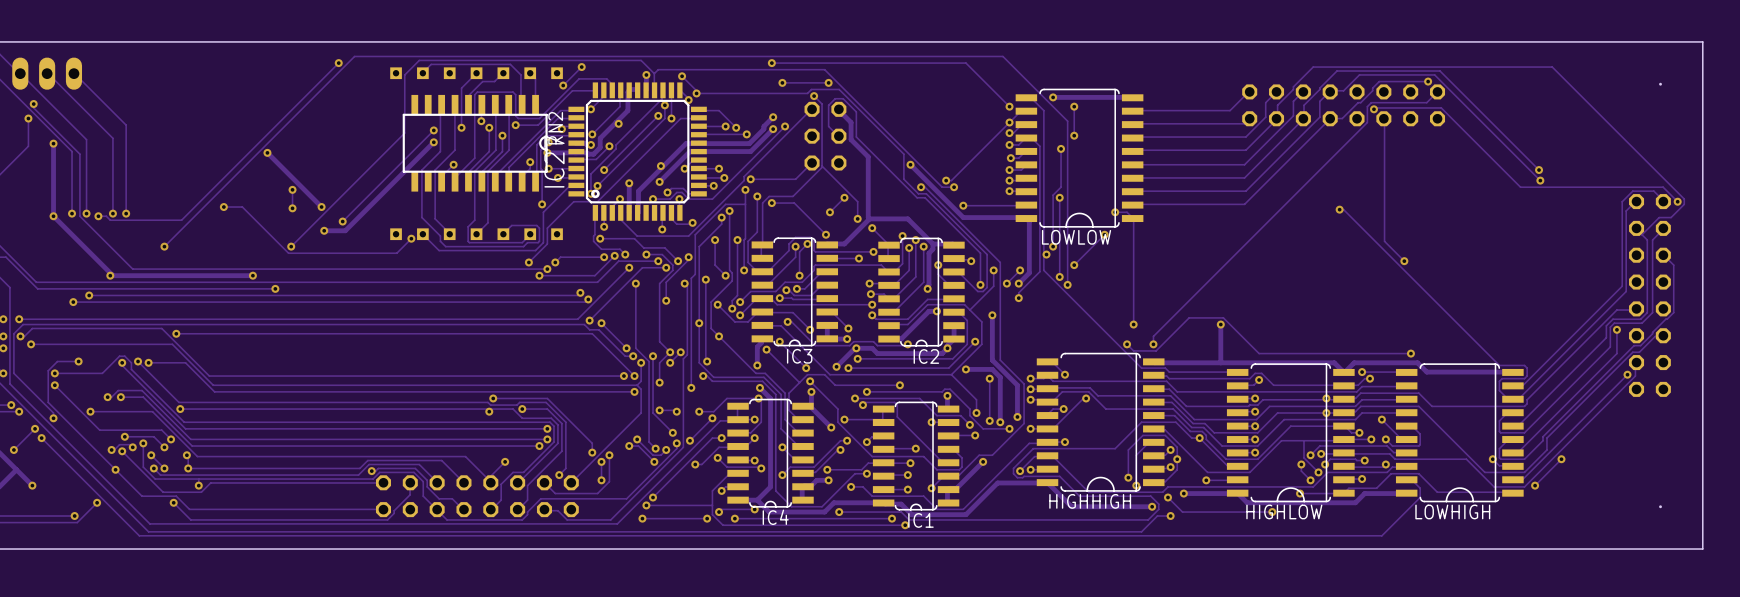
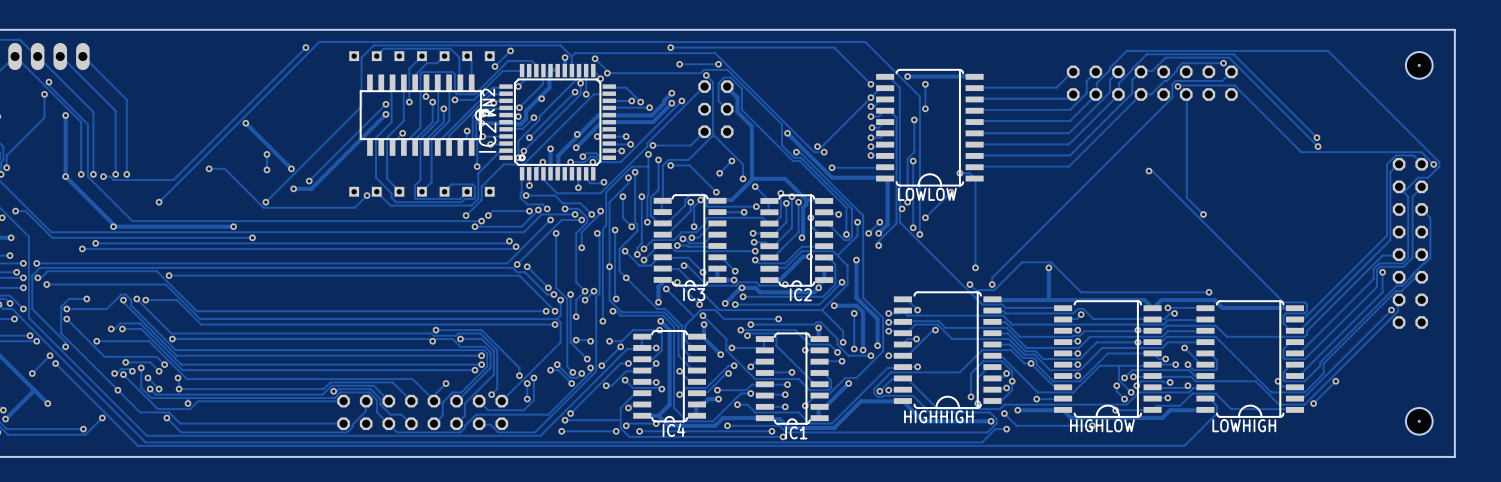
hole: none -> (1419, 65)
hole: none -> (1419, 421)

